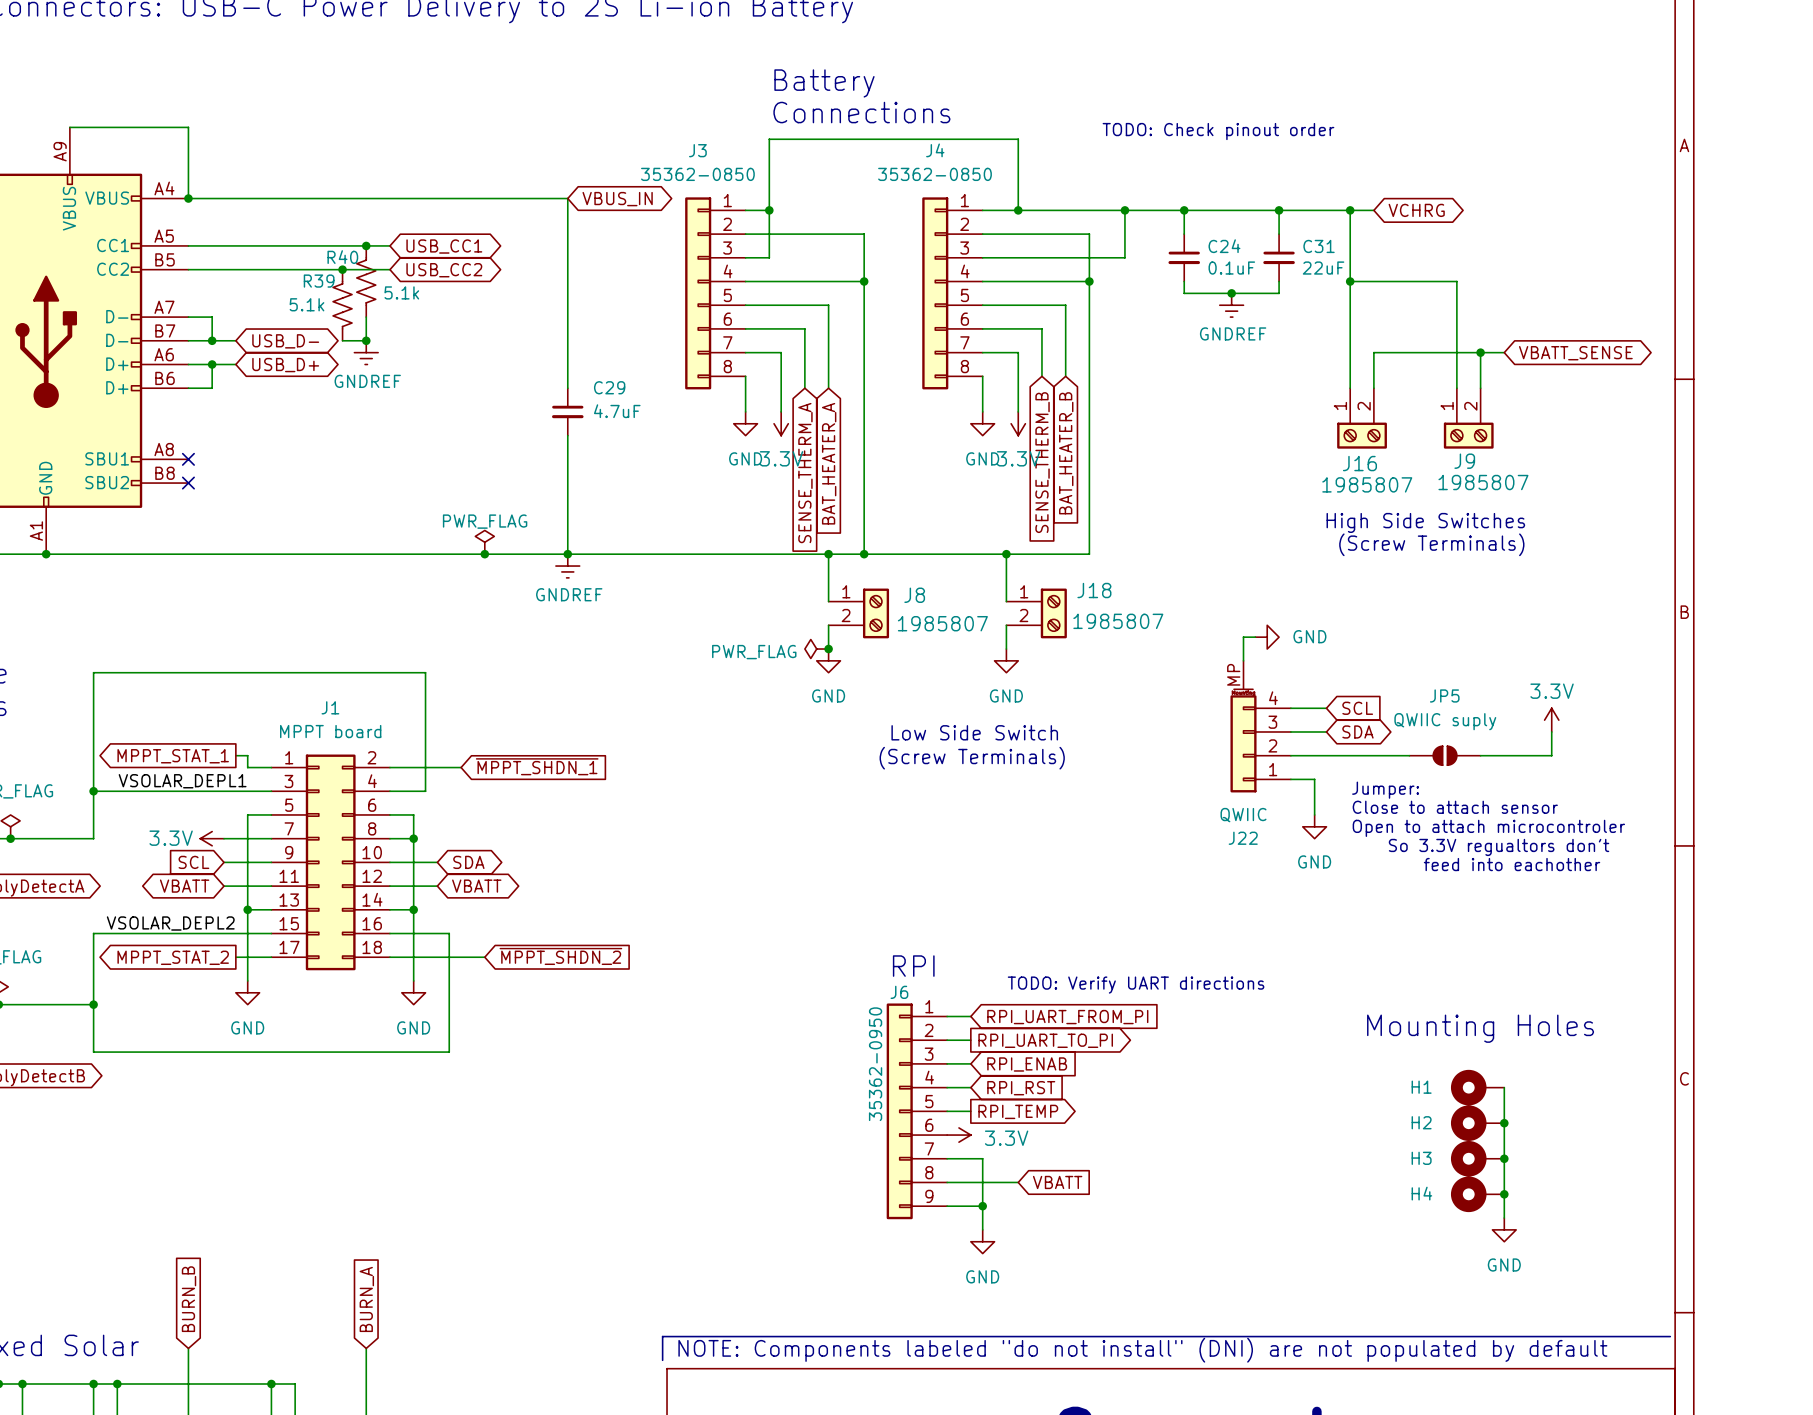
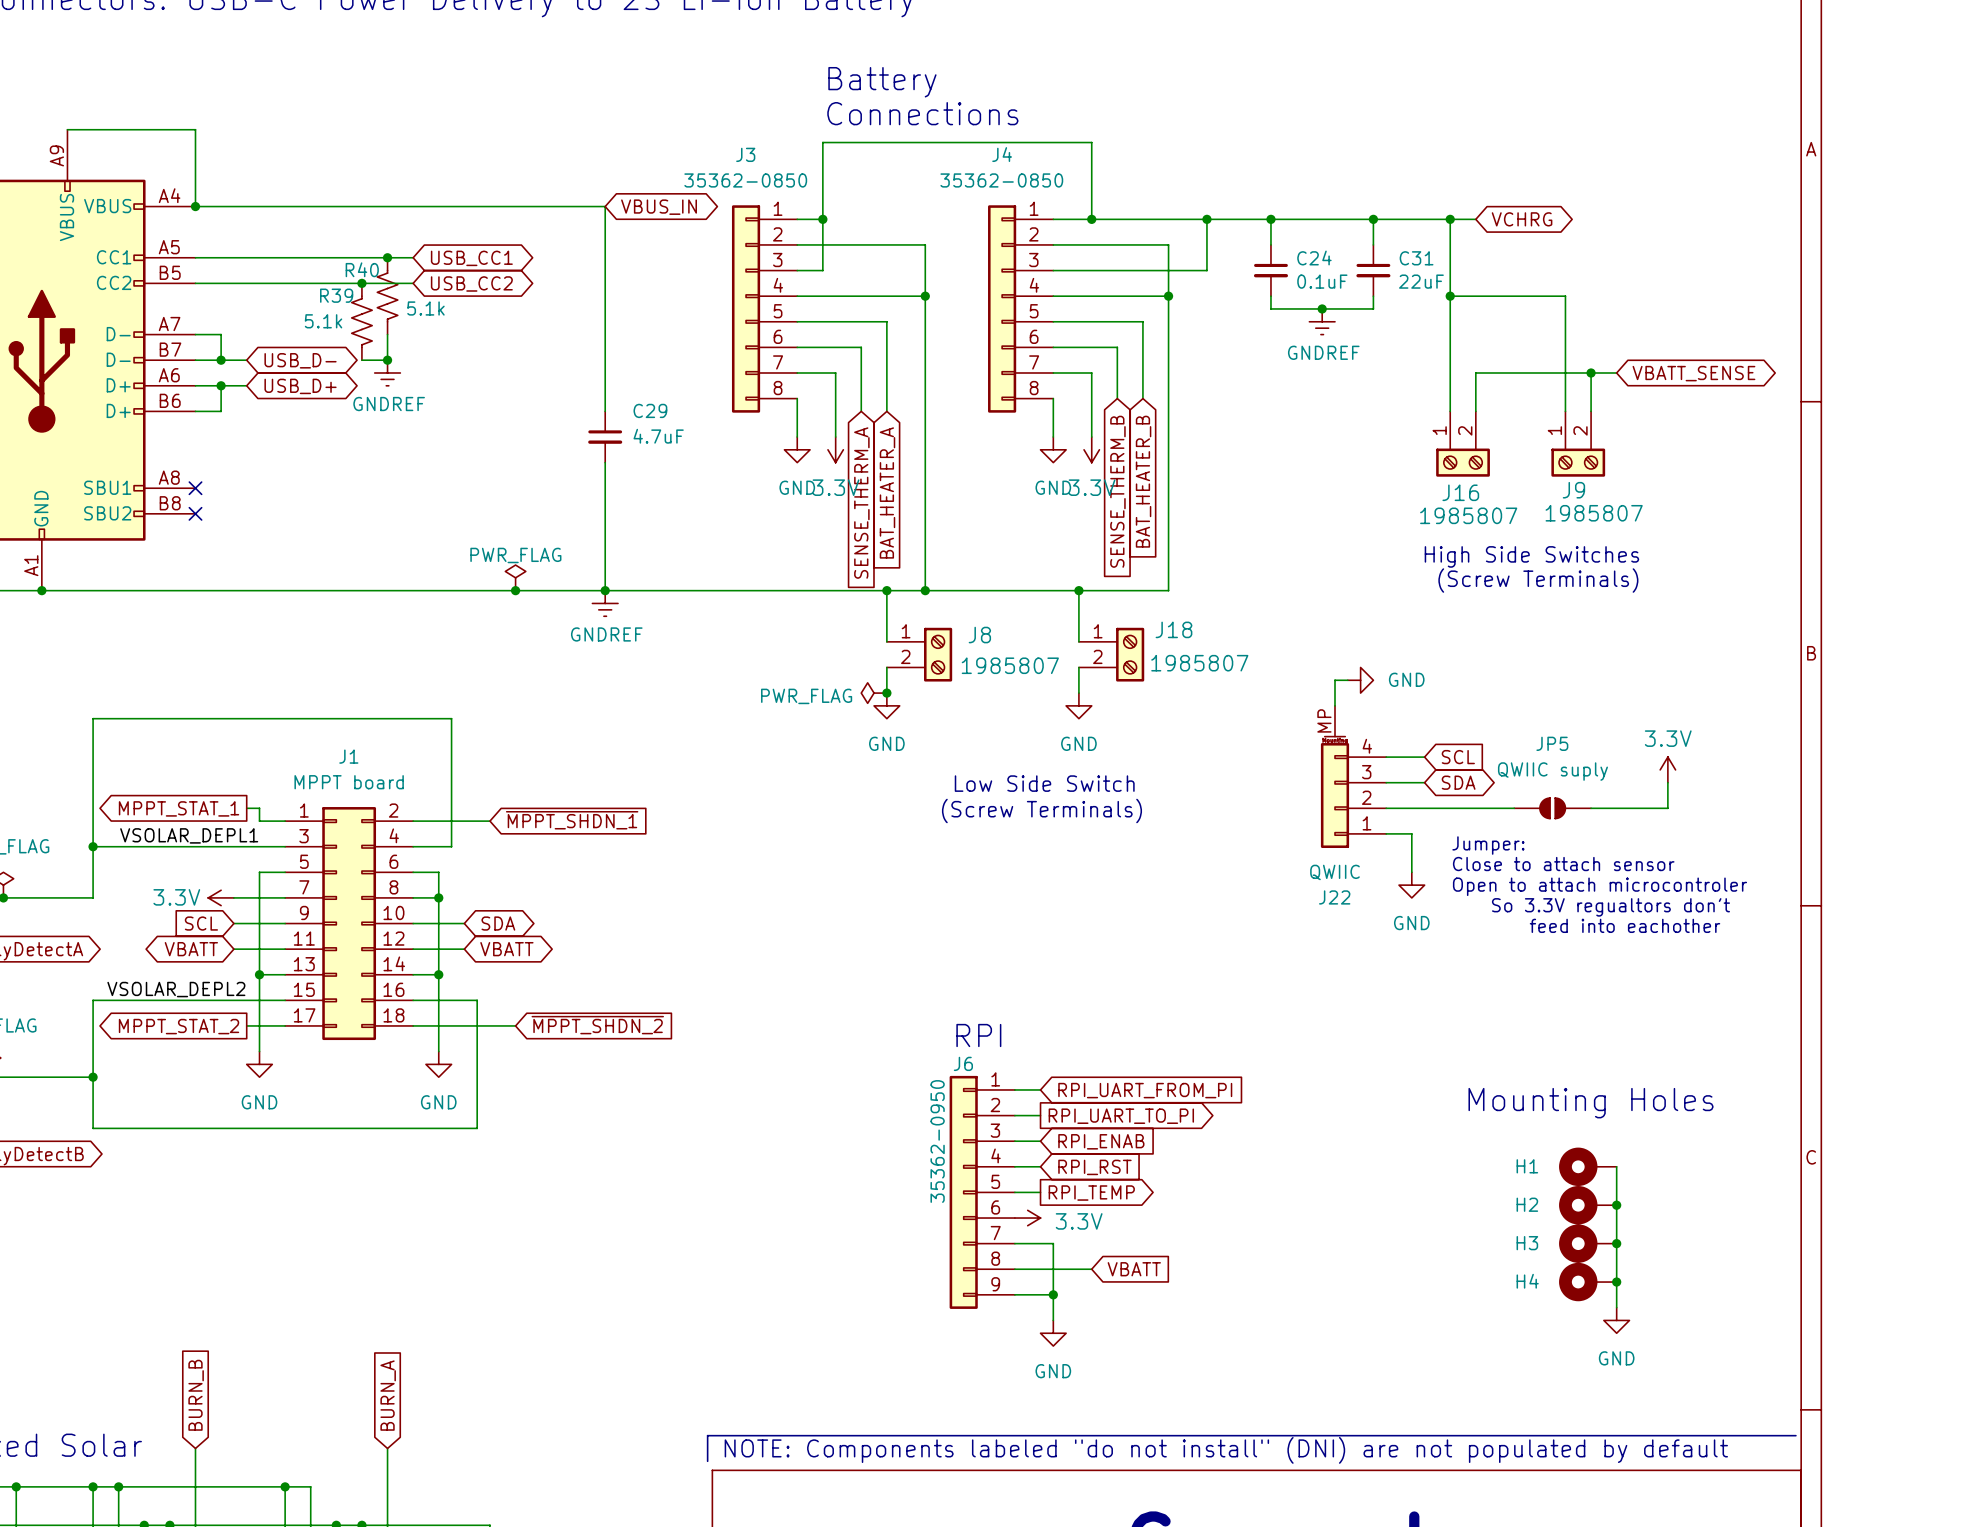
text: TODO: Check pinout order (1218, 131) -> none
text: TODO: Verify UART directions (1136, 985) -> none

